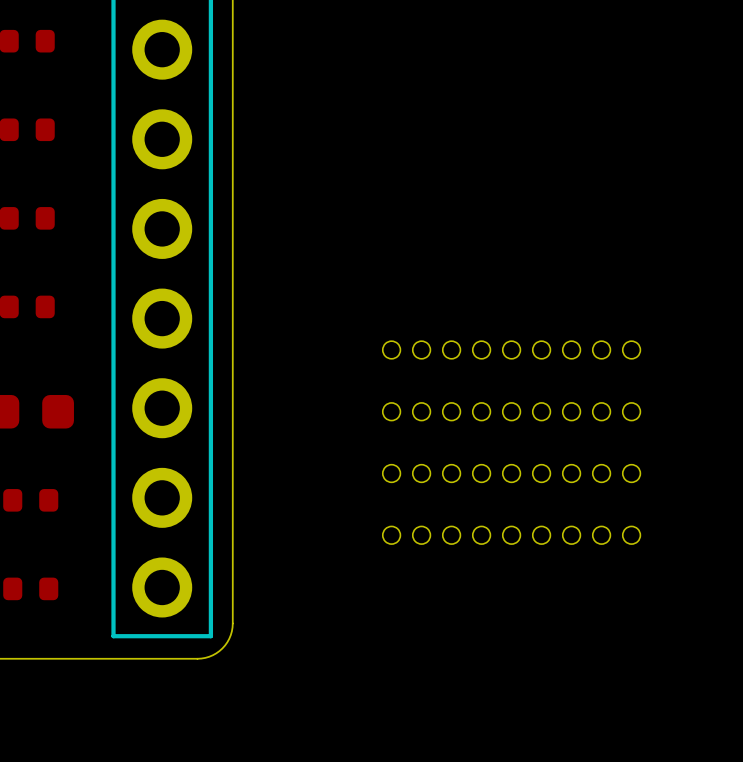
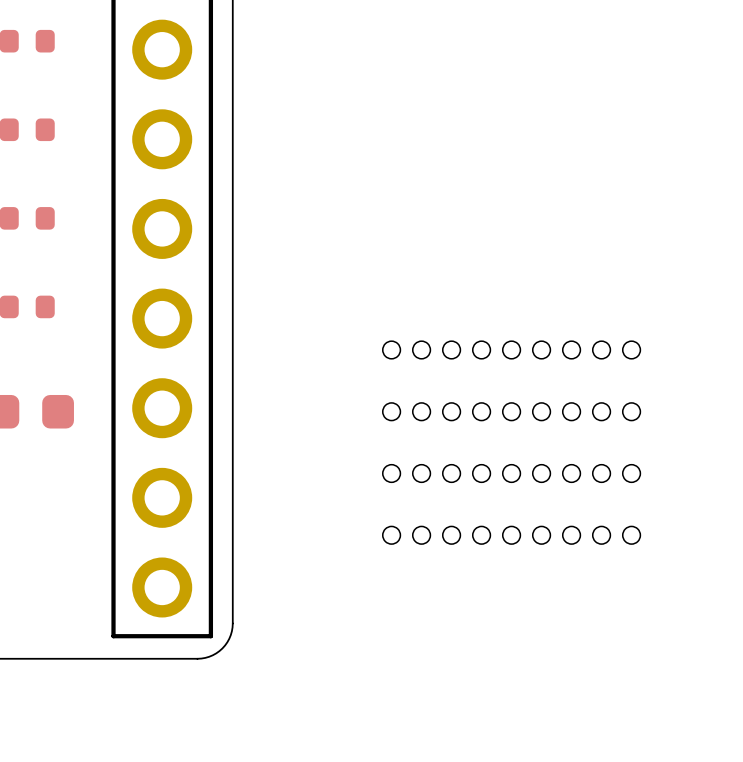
part: (30, 500) -> none
part: (30, 588) -> none

